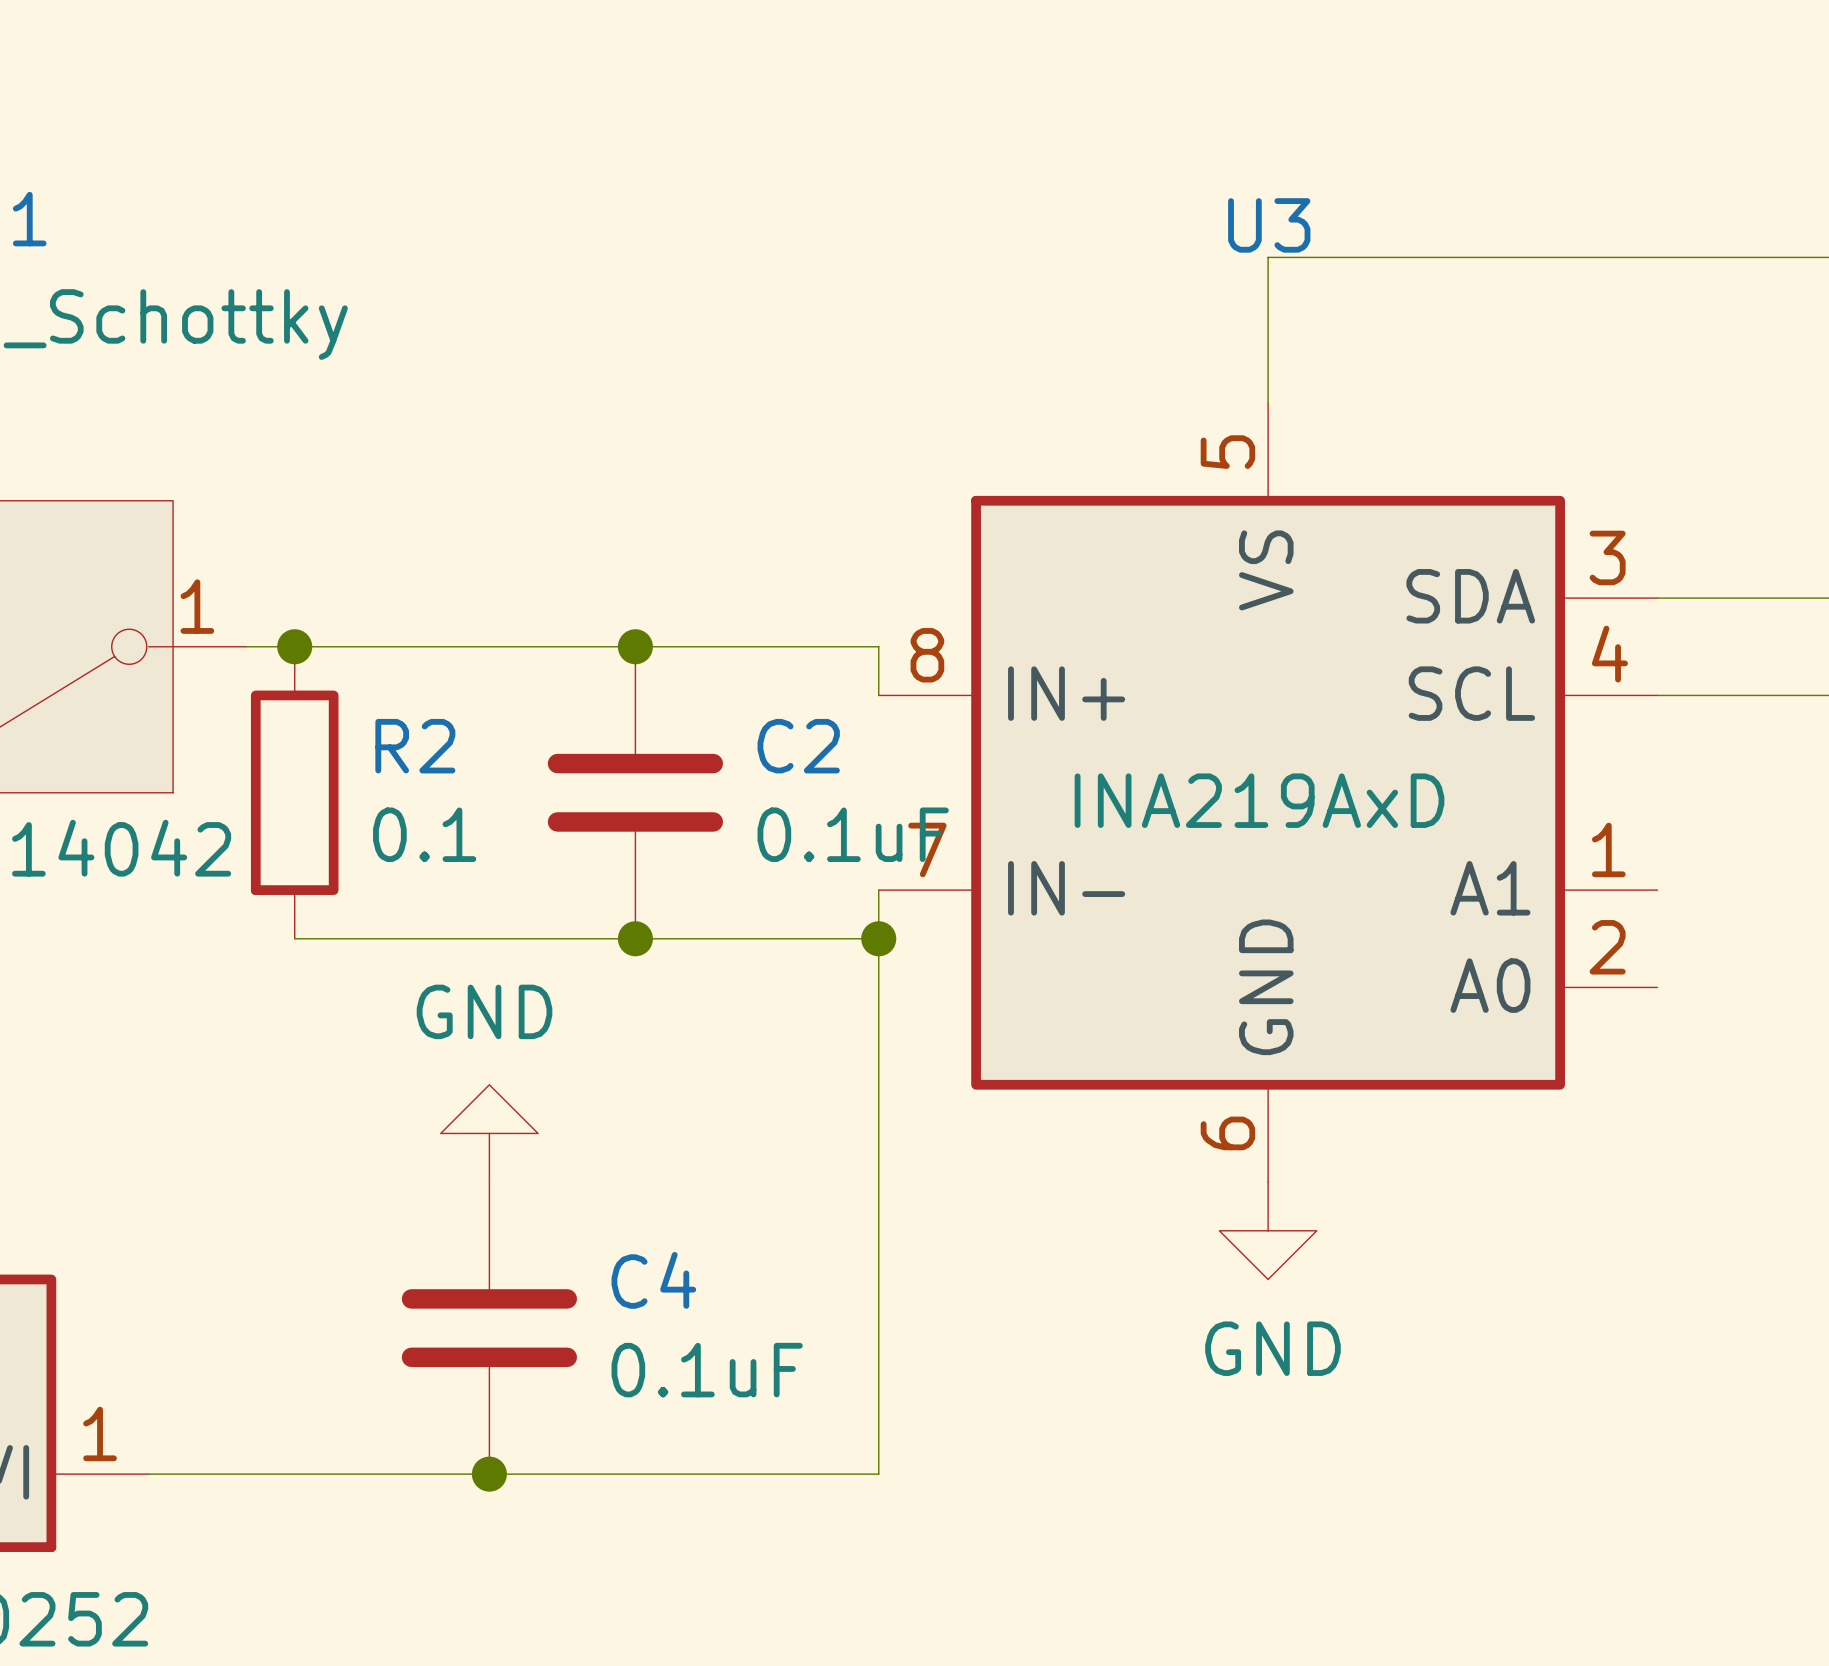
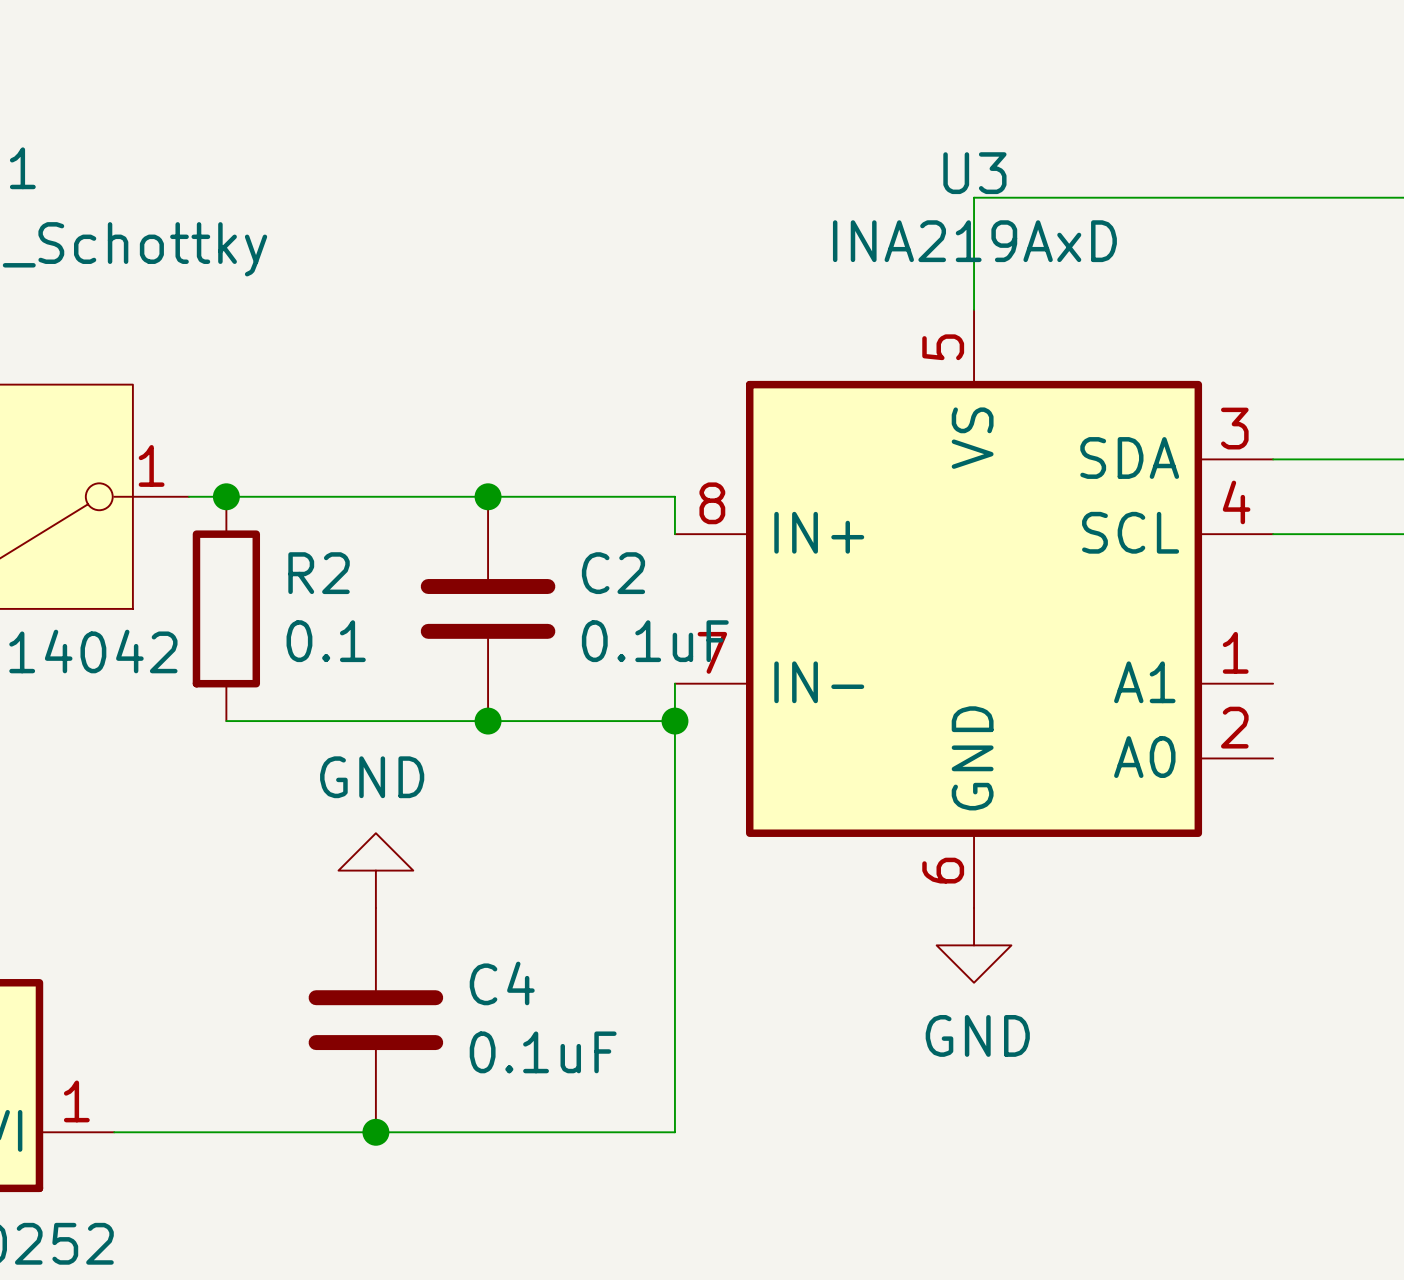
U3 value position: INA219AxD (1259, 800) -> INA219AxD (974, 241)

